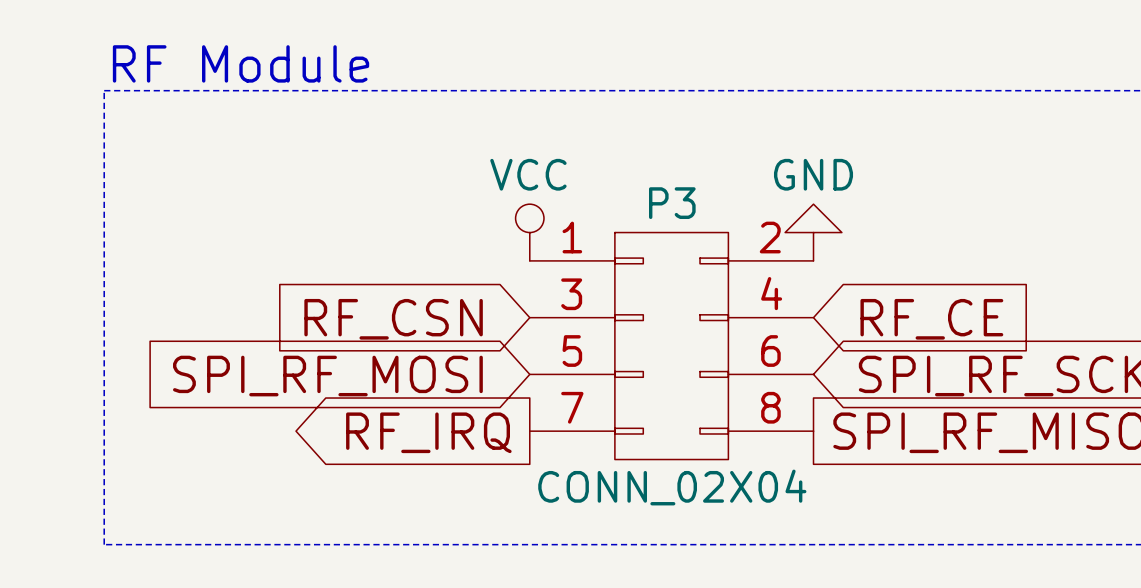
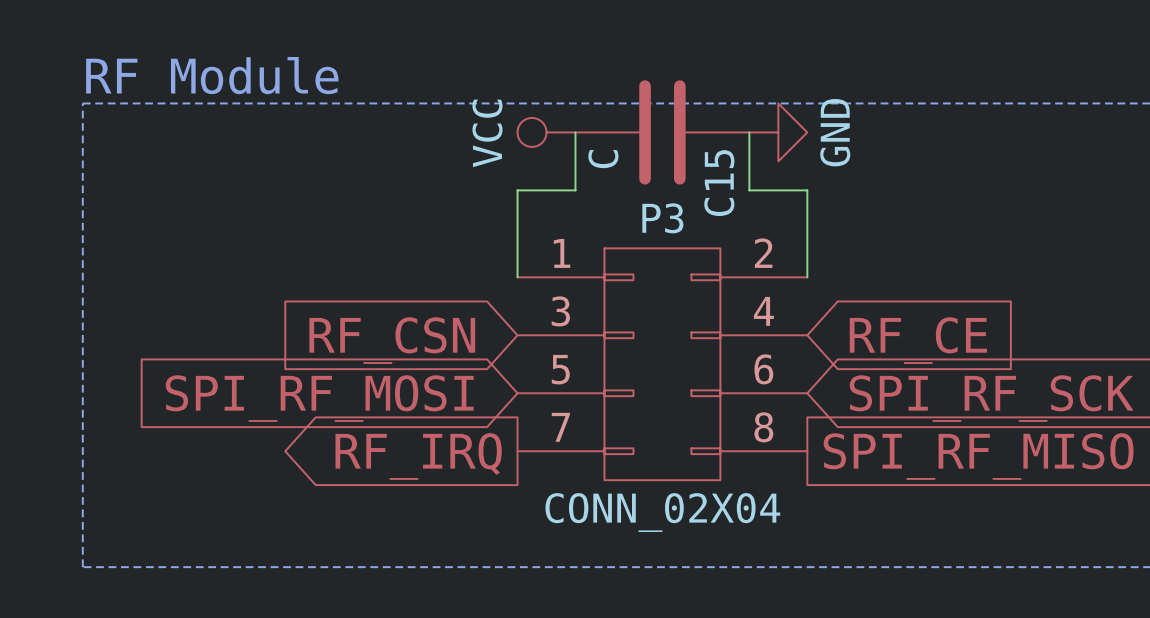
wire: none -> (575, 132) (575, 190) (517, 190) (517, 277)
C15: none -> C (662, 132)
wire: none -> (749, 132) (749, 190) (807, 190) (807, 277)
power symbol rotation: 0° (529, 232) -> 90° counterclockwise (546, 132)
power symbol position: VCC (529, 232) -> VCC (546, 132)
power symbol rotation: 0° (813, 232) -> 90° clockwise (778, 132)
power symbol position: GND (813, 232) -> GND (778, 132)

